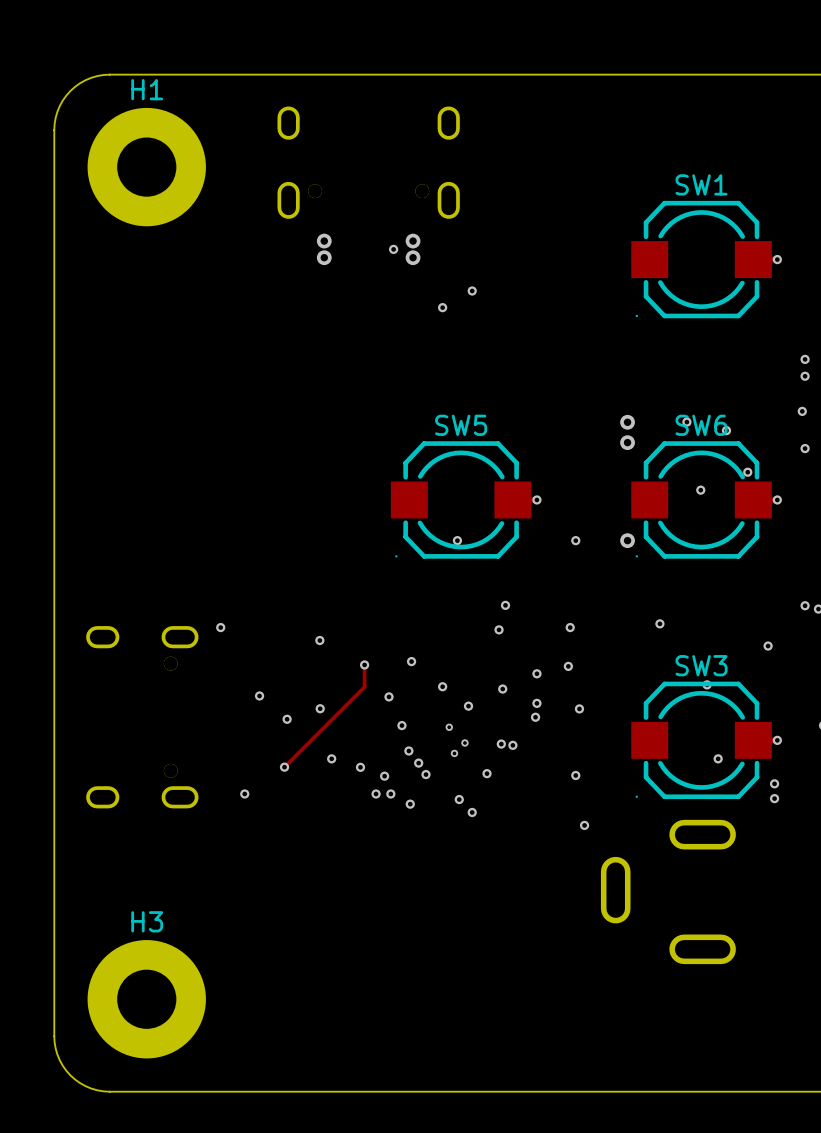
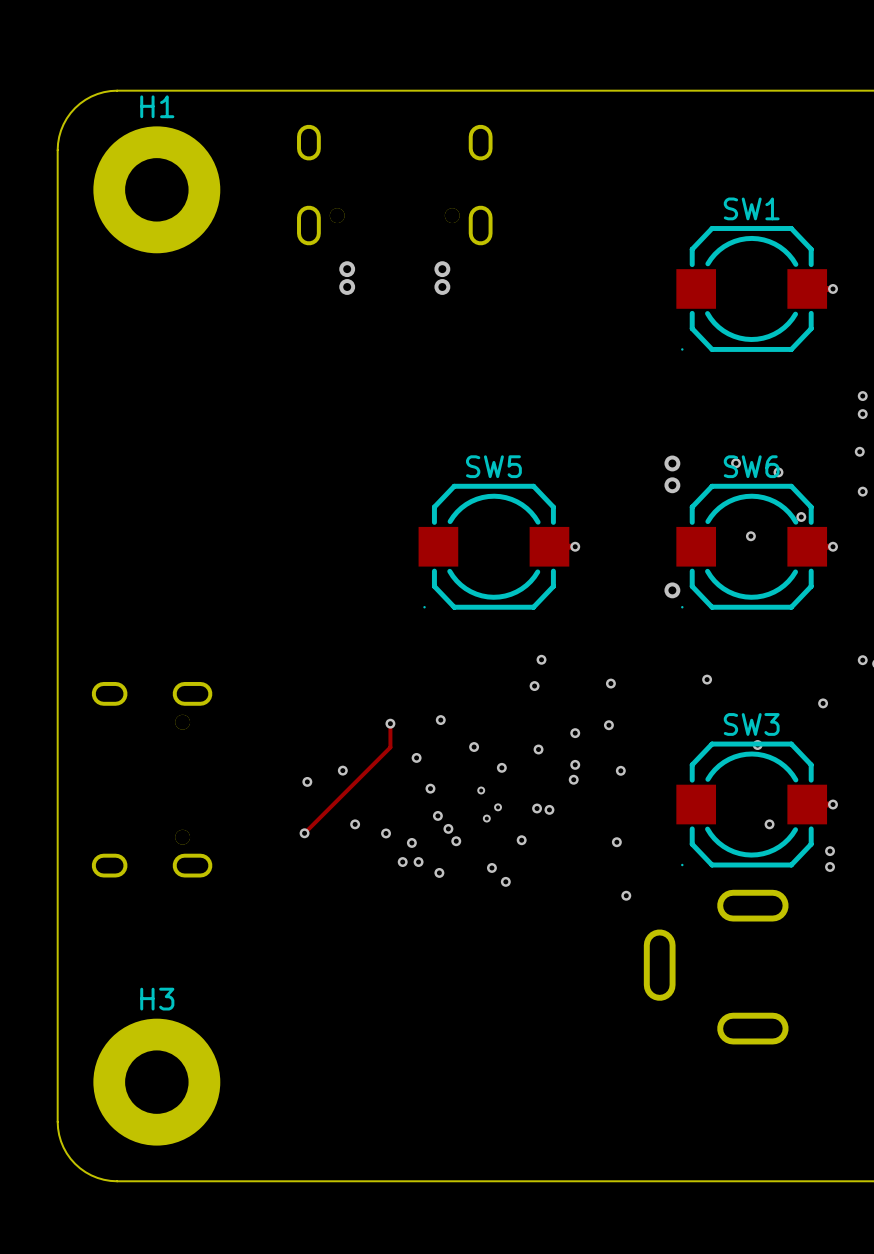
via: (393, 249) -> none
via: (472, 290) -> none
via: (442, 307) -> none
via: (457, 540) -> none
via: (575, 540) -> none
via: (220, 627) -> none
via: (319, 640) -> none
via: (259, 695) -> none
via: (244, 793) -> none

